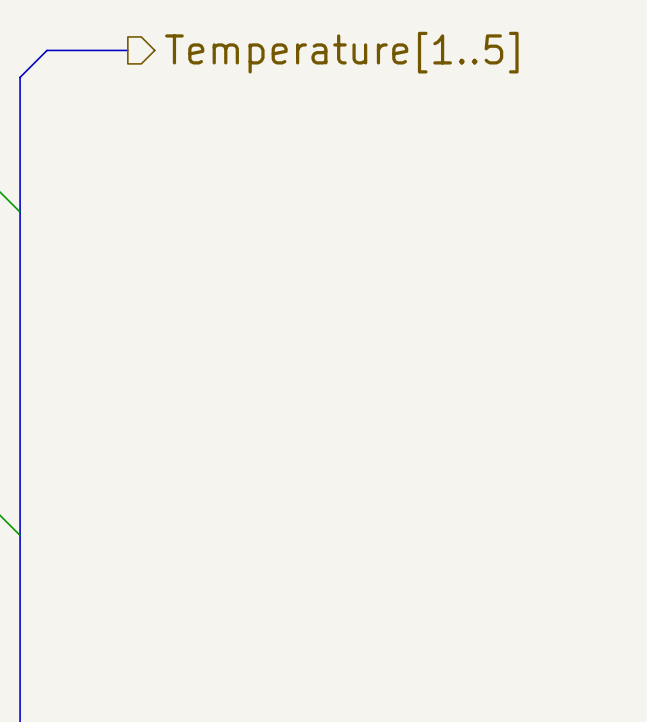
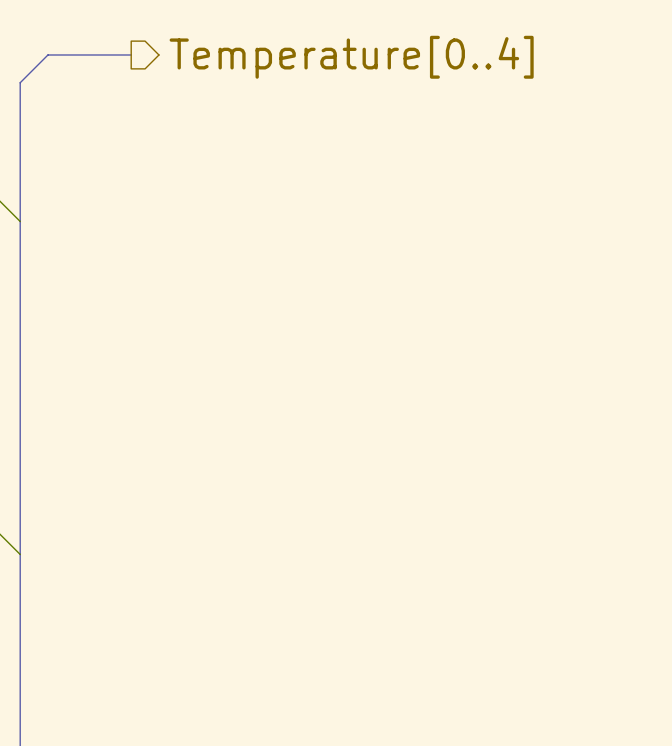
hierarchical label: Temperature[1..5] (341, 52) -> Temperature[0..4] (351, 57)

